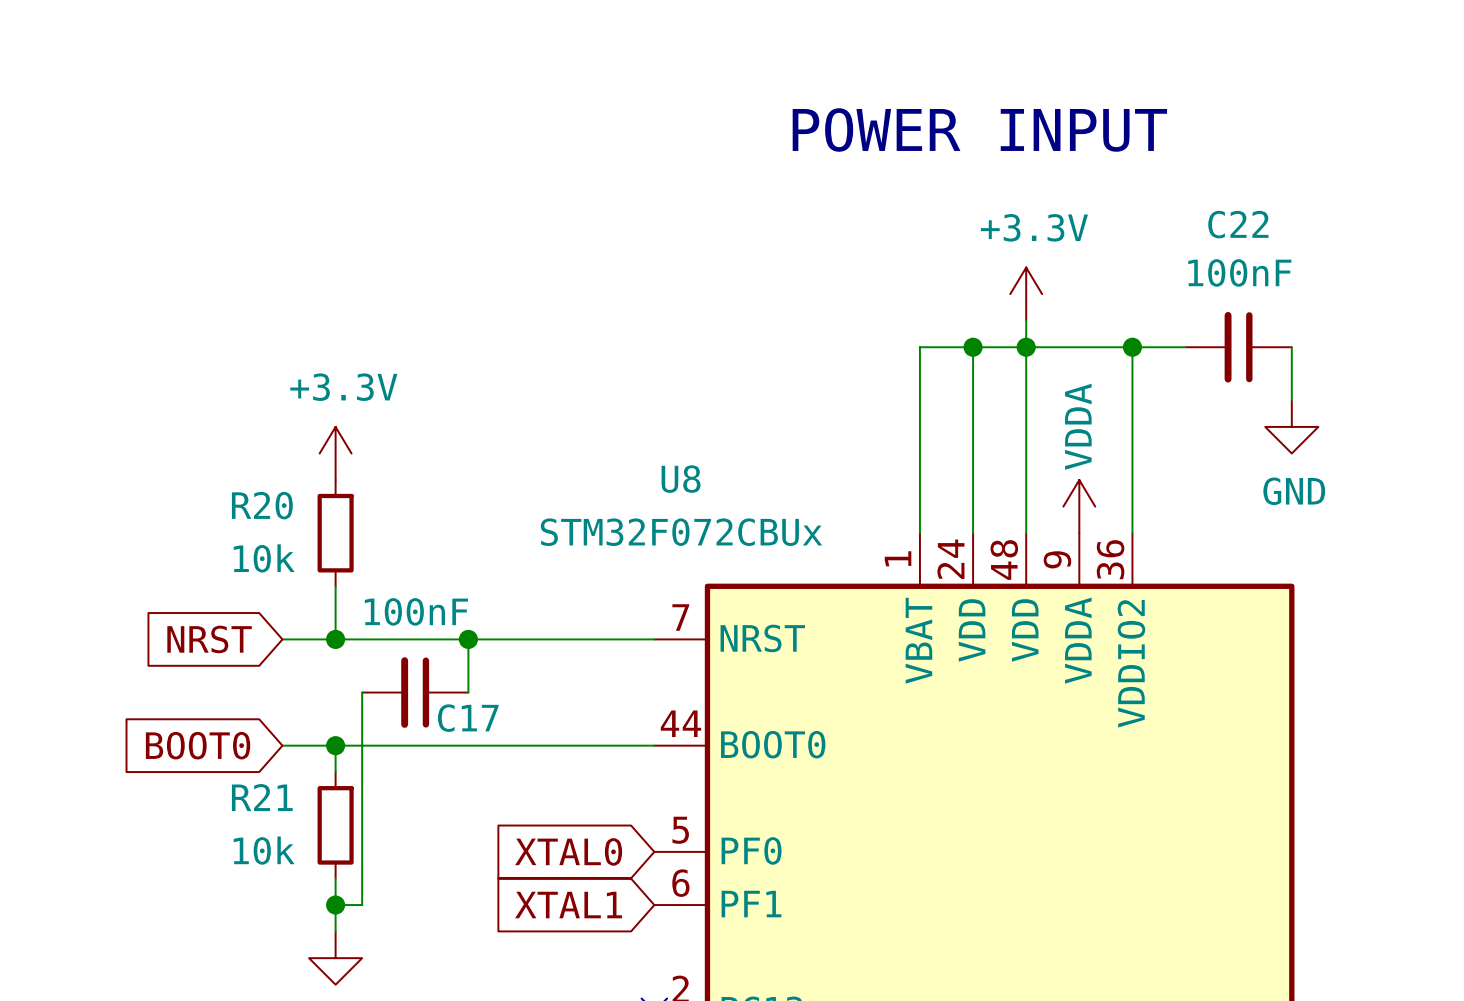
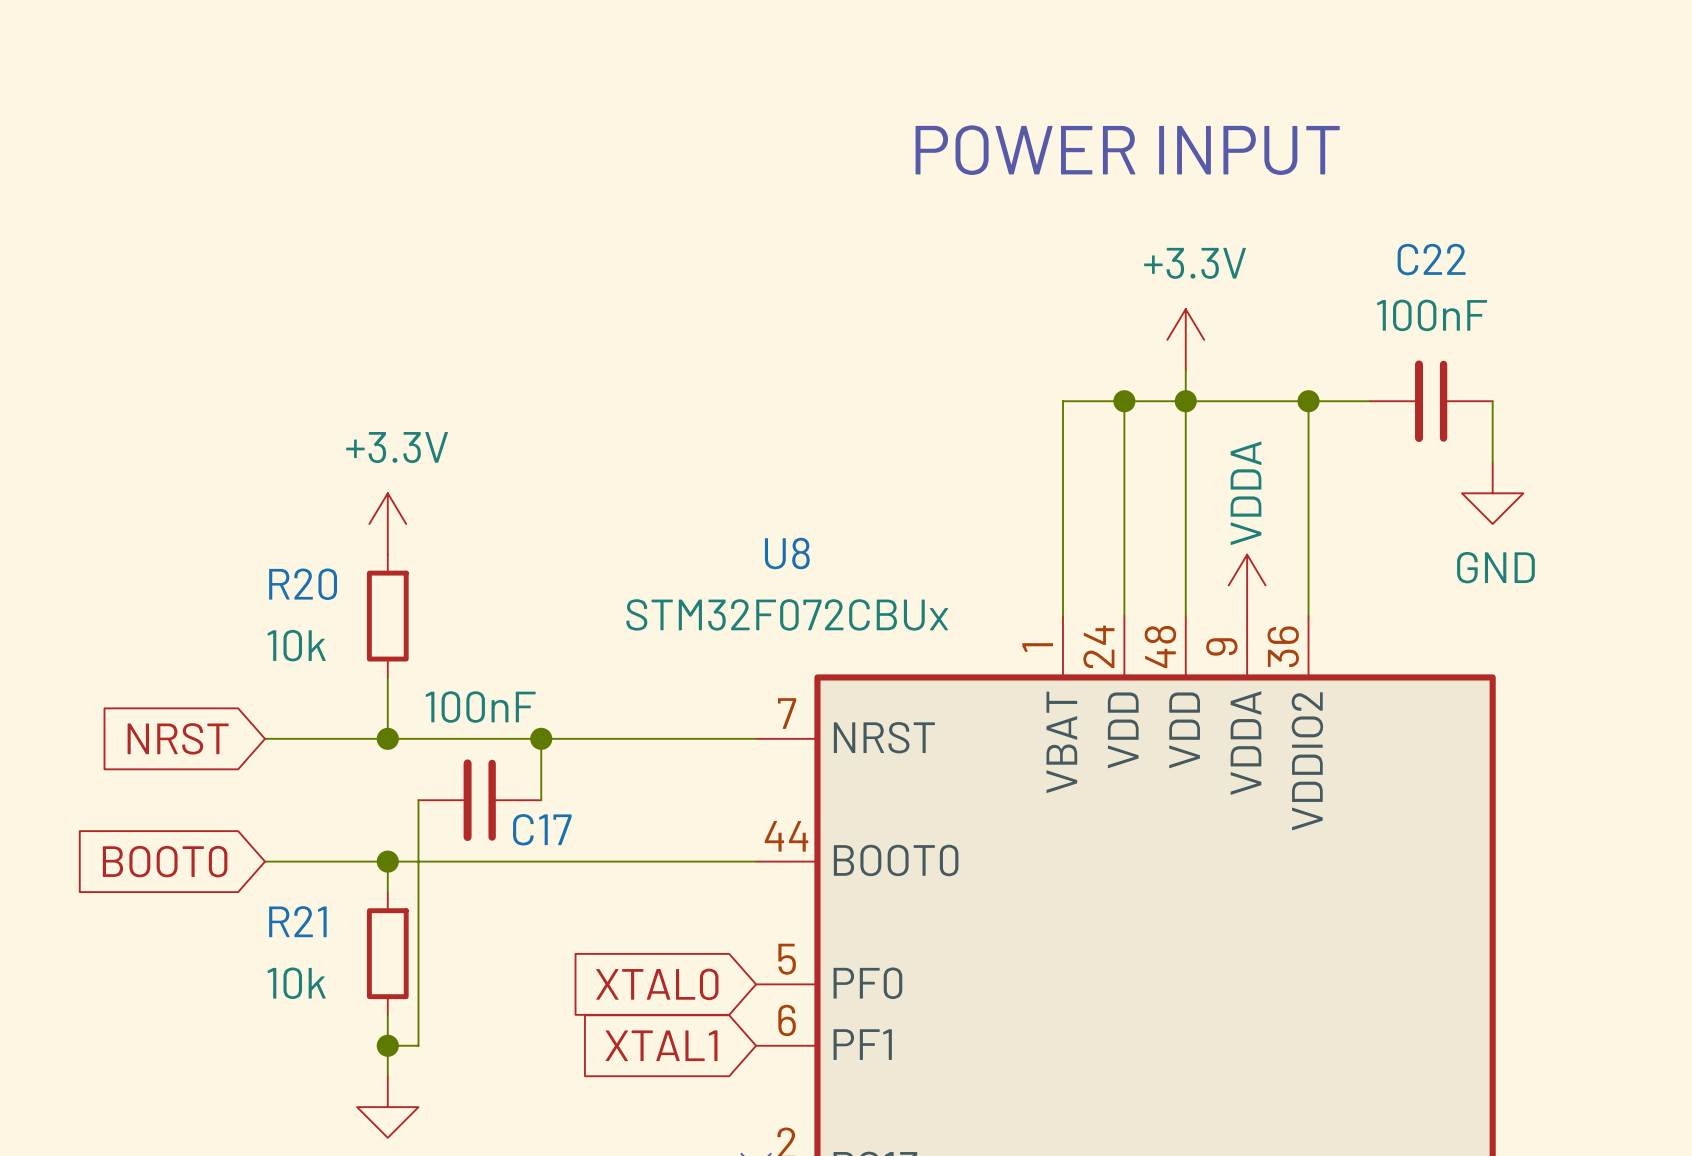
global label position: NRST (209, 639) -> NRST (178, 738)
wire: none -> (265, 738) (326, 738)
global label position: BOOT0 (198, 745) -> BOOT0 (165, 861)
wire: none -> (265, 861) (326, 861)

